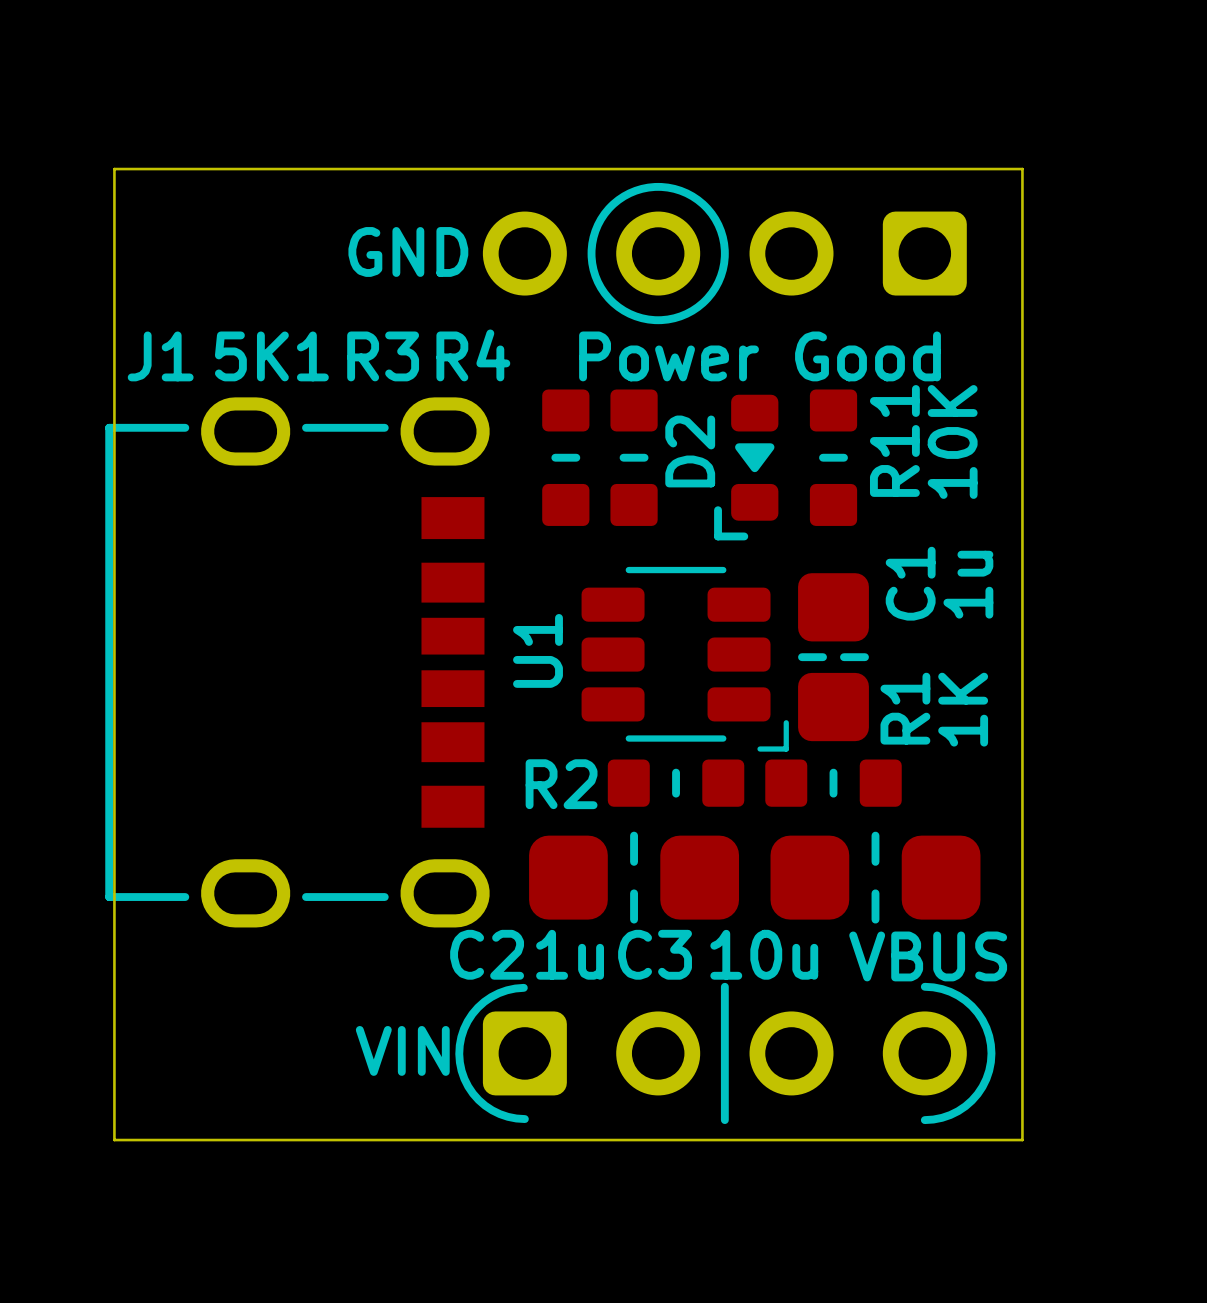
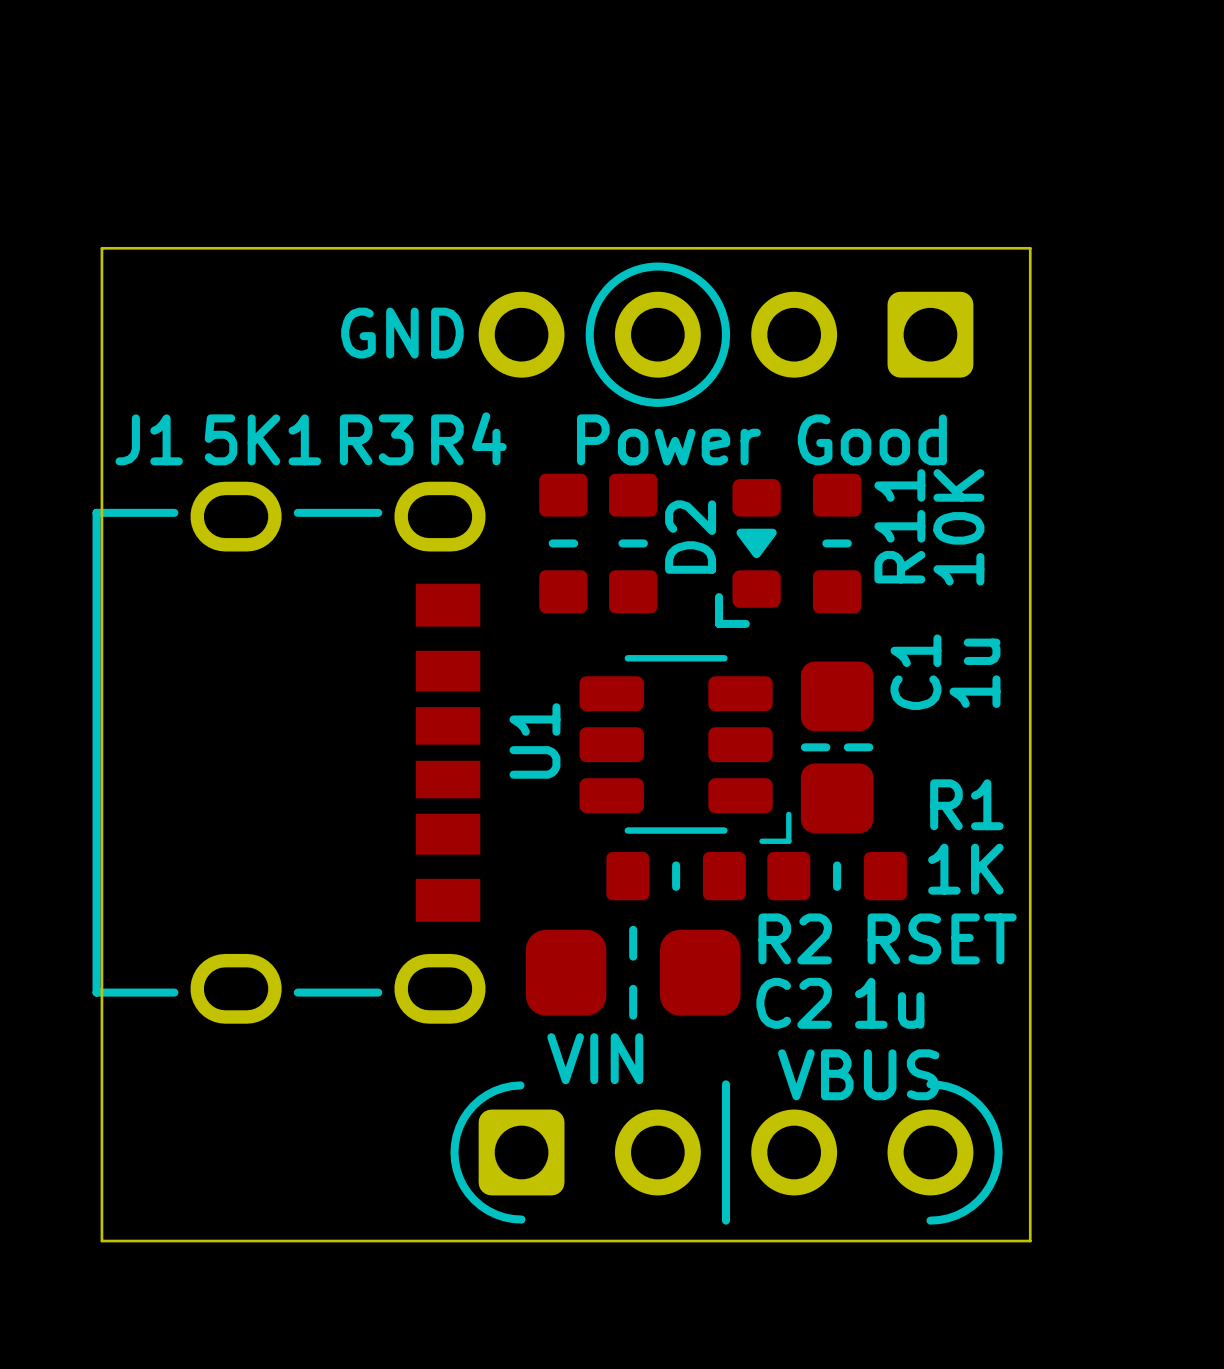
R1 name rotation: 0° (905, 708) -> 90° clockwise (966, 804)
R1 value rotation: 0° (963, 709) -> 90° clockwise (965, 869)
R2 name position: R2 (561, 784) -> R2 (795, 938)
R2 value: none -> RSET (942, 938)
C3: 10u (875, 877) -> none
C2 name position: C2 (487, 954) -> C2 (794, 1003)
C2 value position: 1u (570, 954) -> 1u (889, 1003)
text position: VBUS (928, 956) -> VBUS (858, 1074)
text position: VIN (402, 1050) -> VIN (595, 1058)

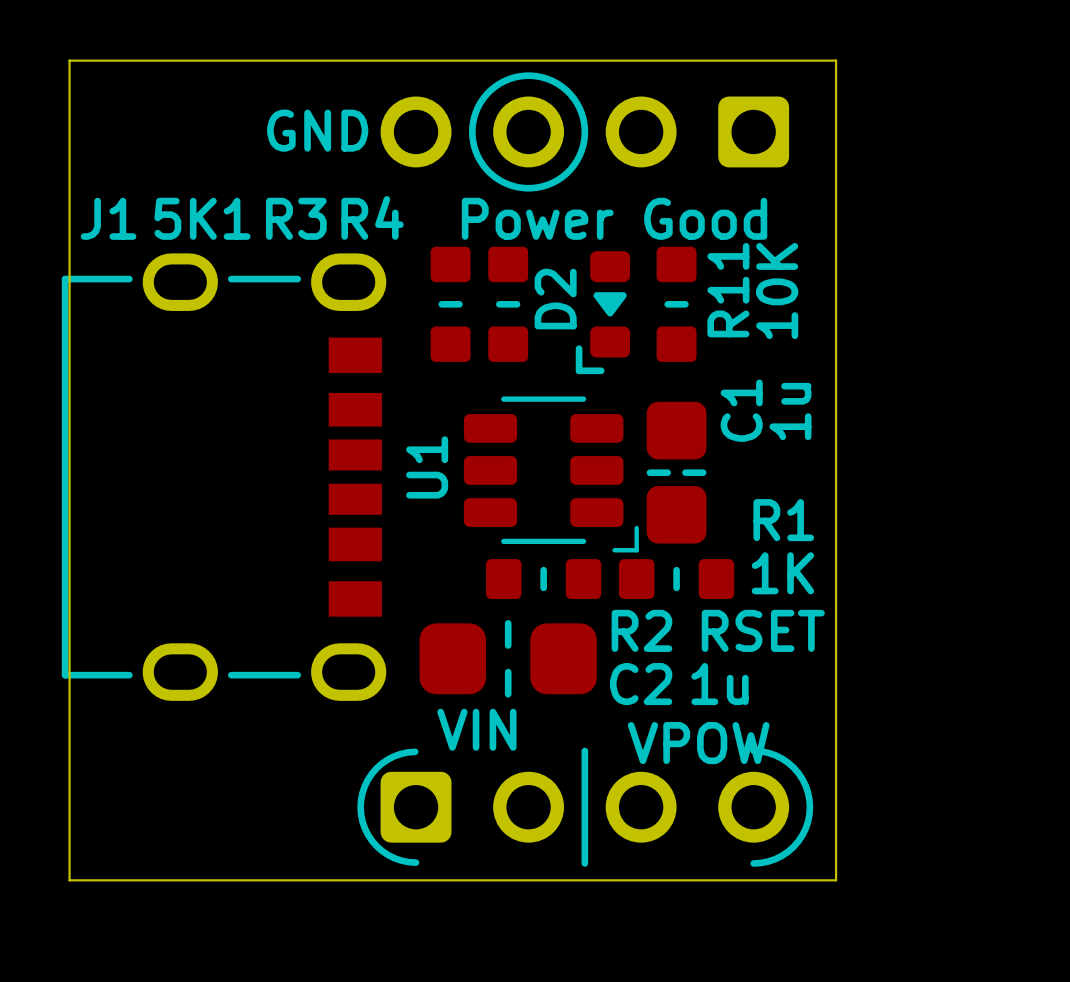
text: VBUS (858, 1074) -> VPOW (698, 743)

